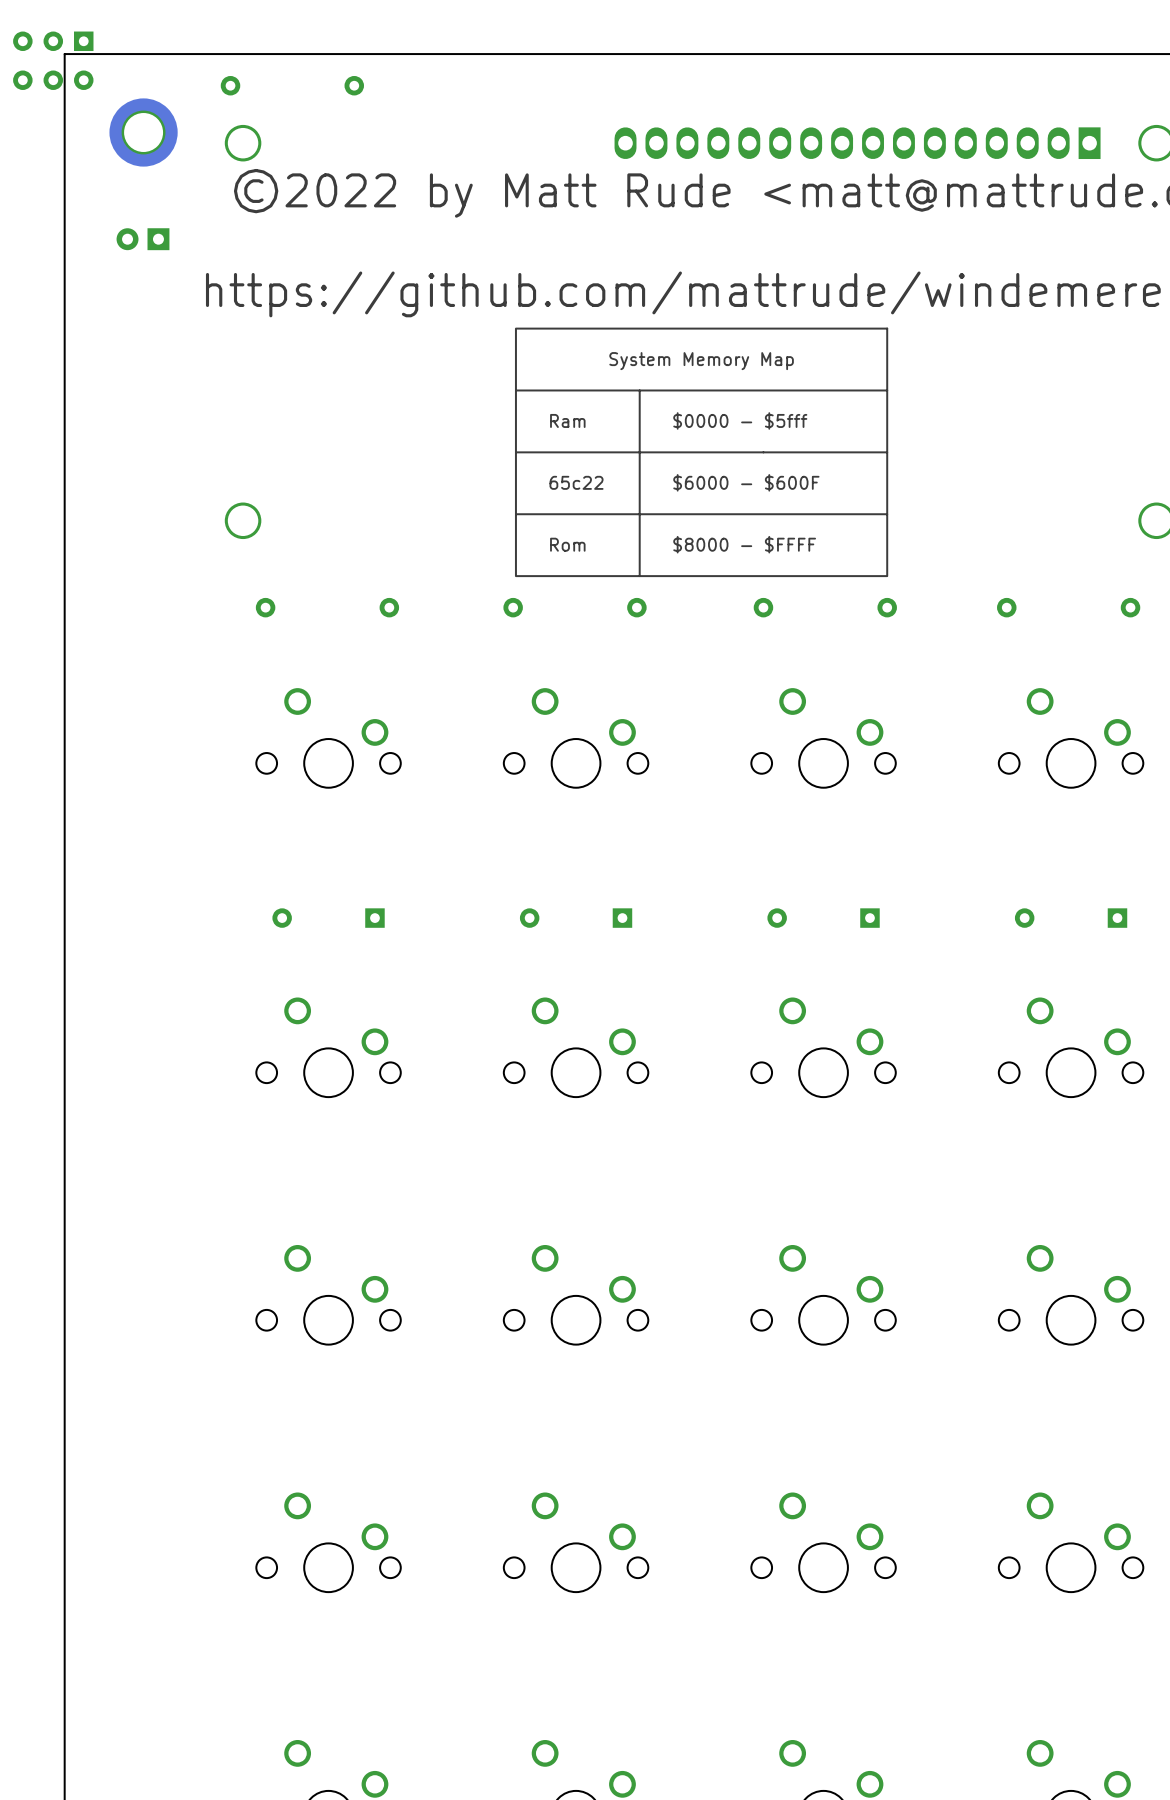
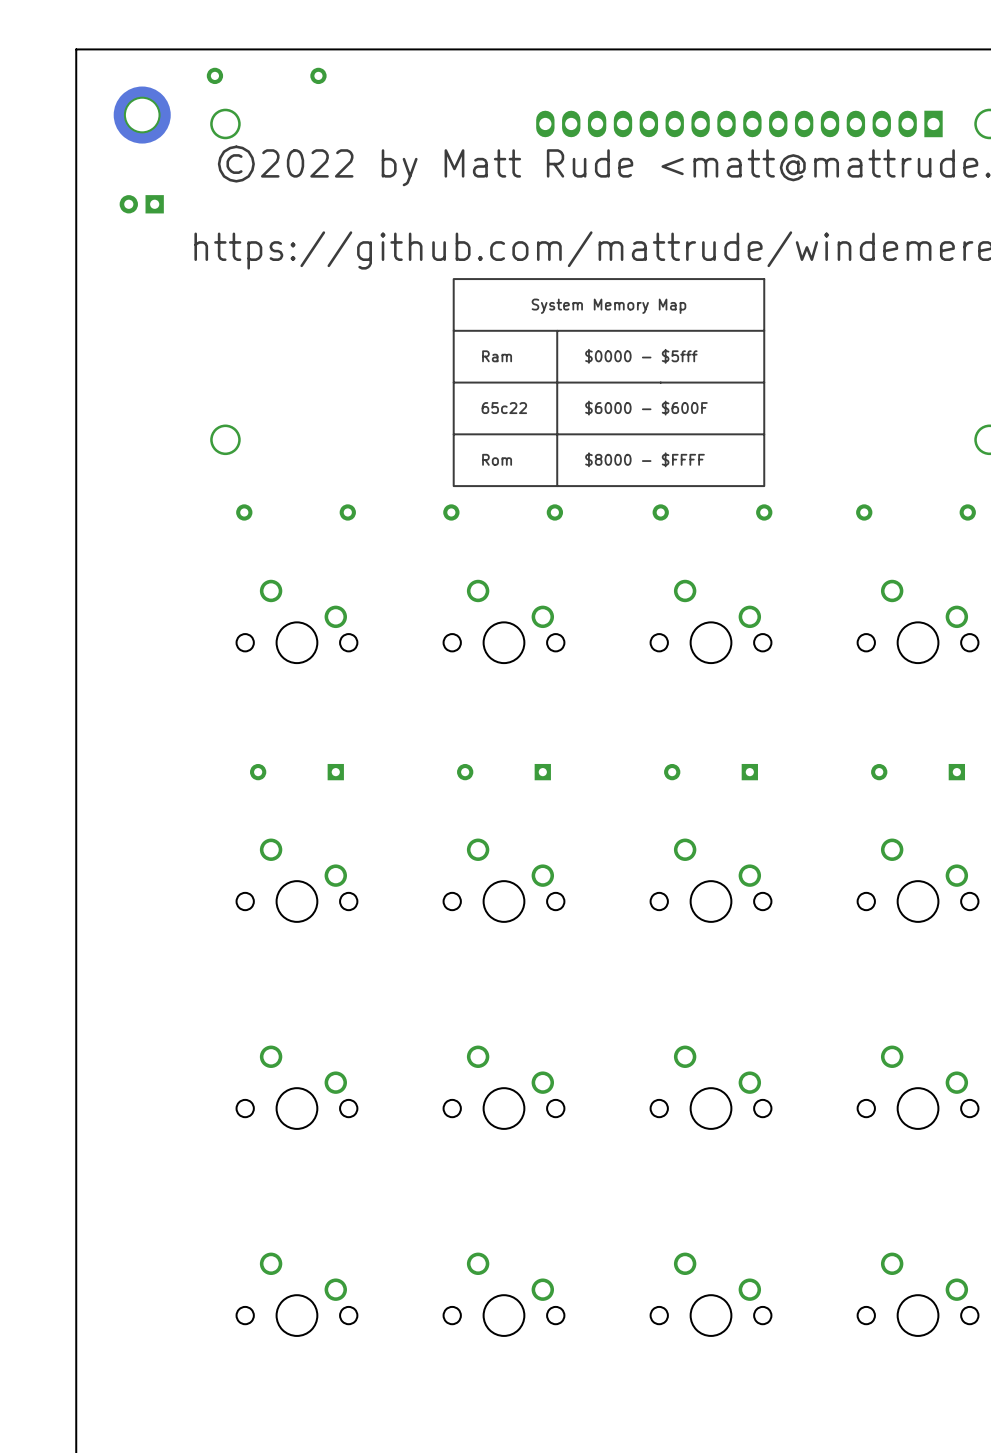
part: (53, 60) -> none

